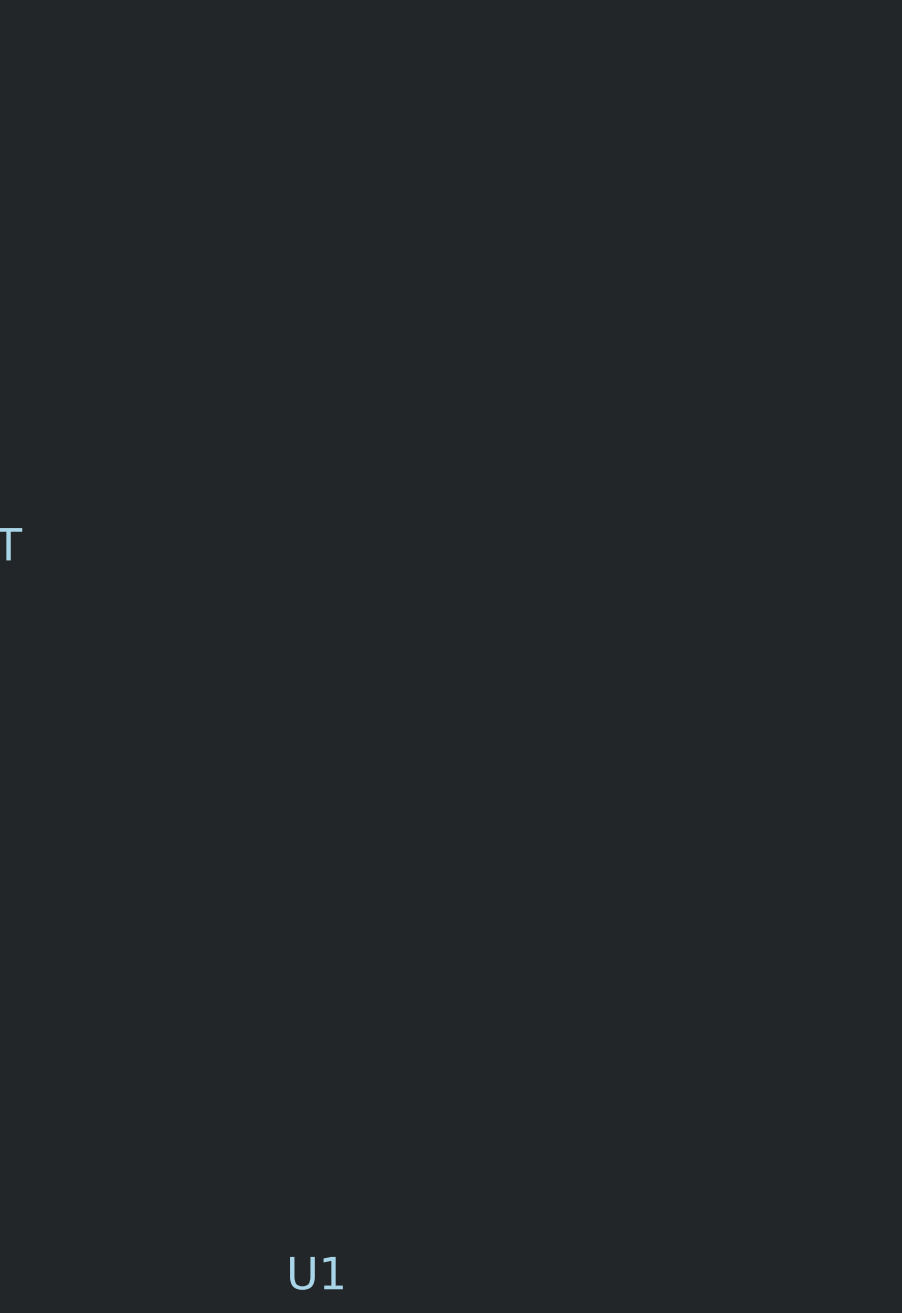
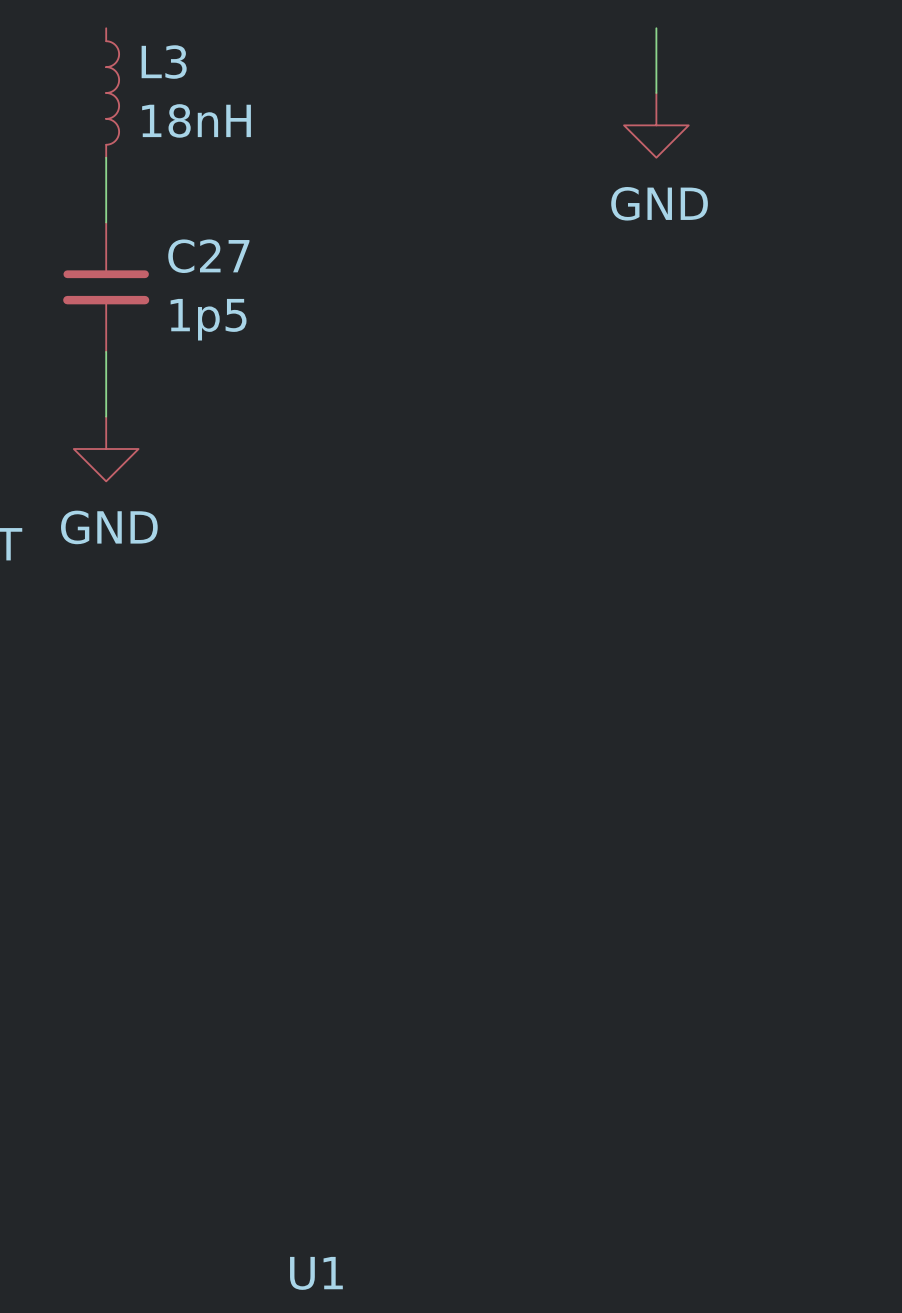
wire: none -> (656, 28) (656, 92)
L3: none -> 18nH (112, 92)
power symbol: none -> GND (656, 125)
wire: none -> (106, 157) (106, 222)
C27: none -> 1p5 (106, 287)
wire: none -> (106, 351) (106, 416)
power symbol: none -> GND (106, 449)

